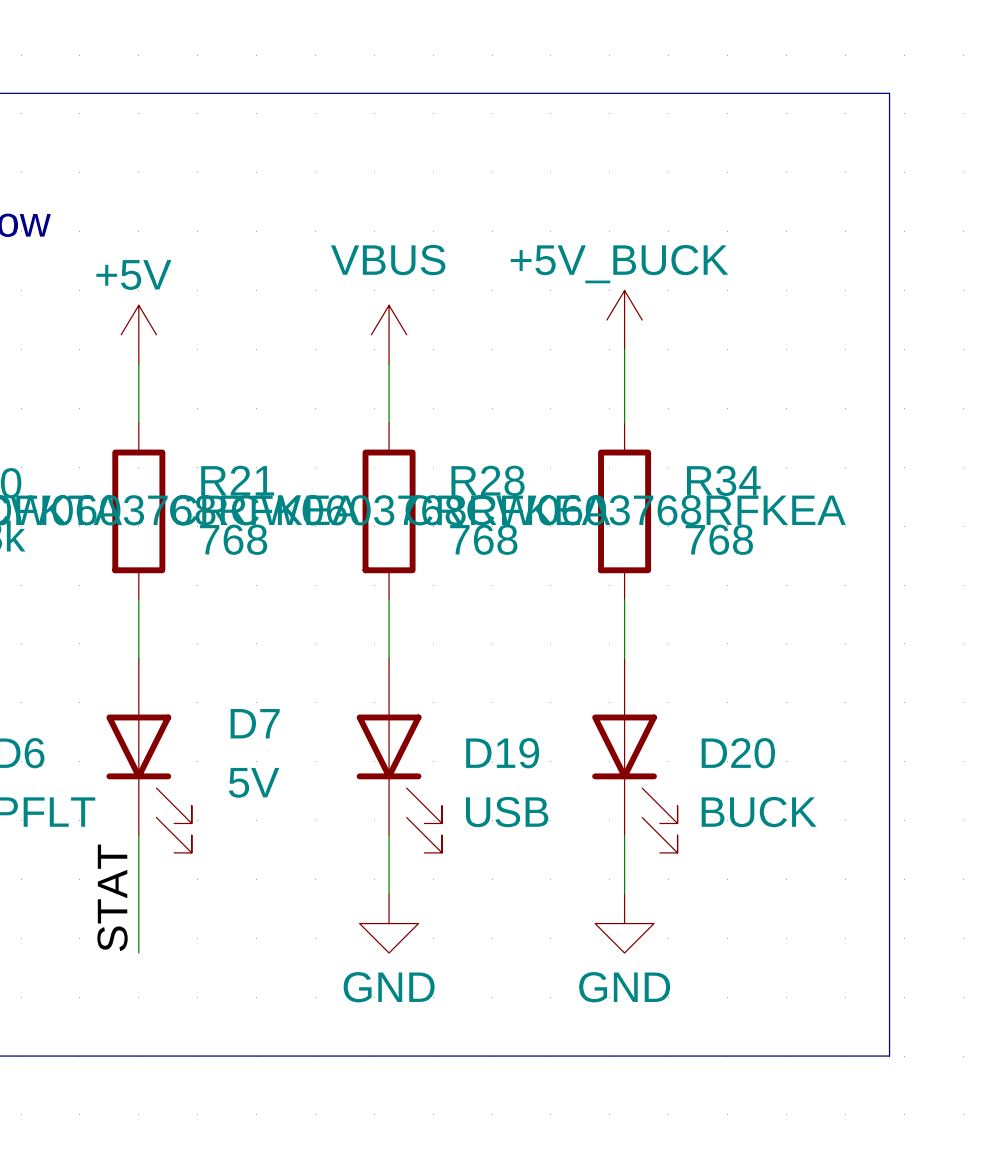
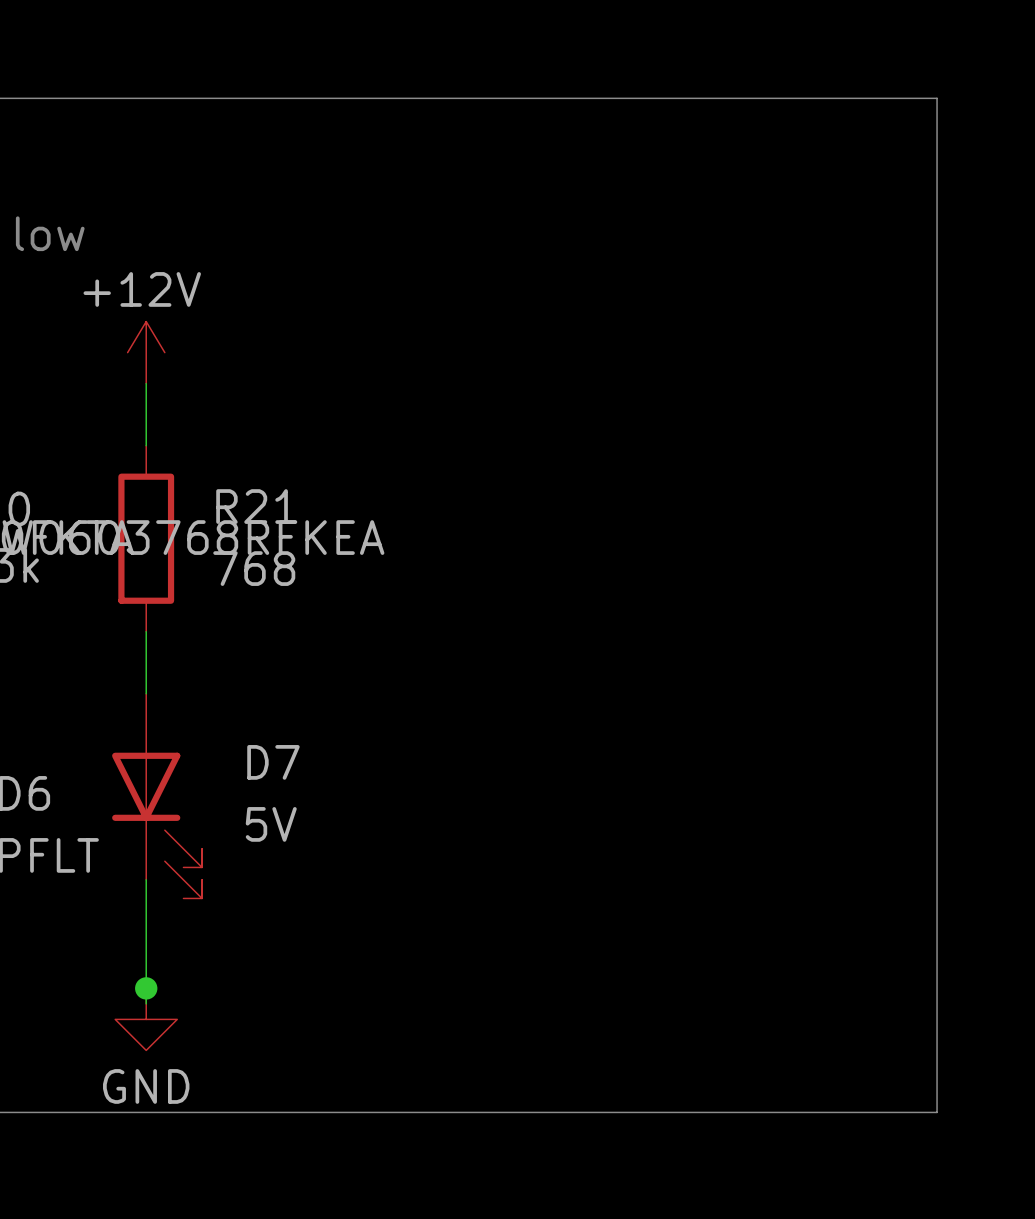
power symbol: +5V_BUCK (624, 320) -> none
power symbol: +5V (138, 334) -> +12V (146, 352)
power symbol: VBUS (389, 334) -> none
wire: (624, 349) (624, 423) -> none
wire: (389, 364) (389, 423) -> none
R28: 768 (389, 511) -> none
R34: 768 (624, 511) -> none
wire: (389, 599) (389, 658) -> none
wire: (624, 599) (624, 658) -> none
D19: USB (399, 755) -> none
D20: BUCK (634, 755) -> none
wire: (389, 835) (389, 894) -> none
wire: (624, 835) (624, 894) -> none
label: STAT (112, 897) -> none
power symbol: GND (389, 923) -> none
power symbol: GND (624, 923) -> none
junction: none -> (146, 988)
power symbol: none -> GND (146, 1019)

